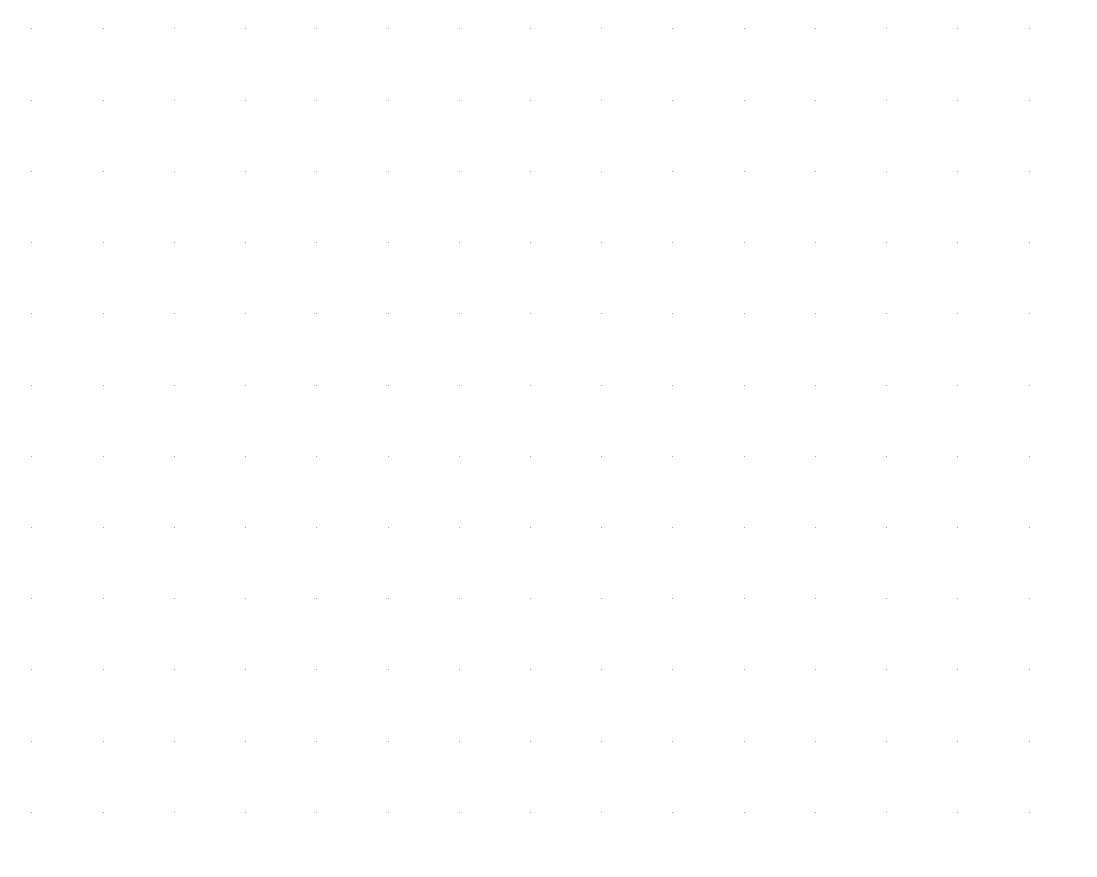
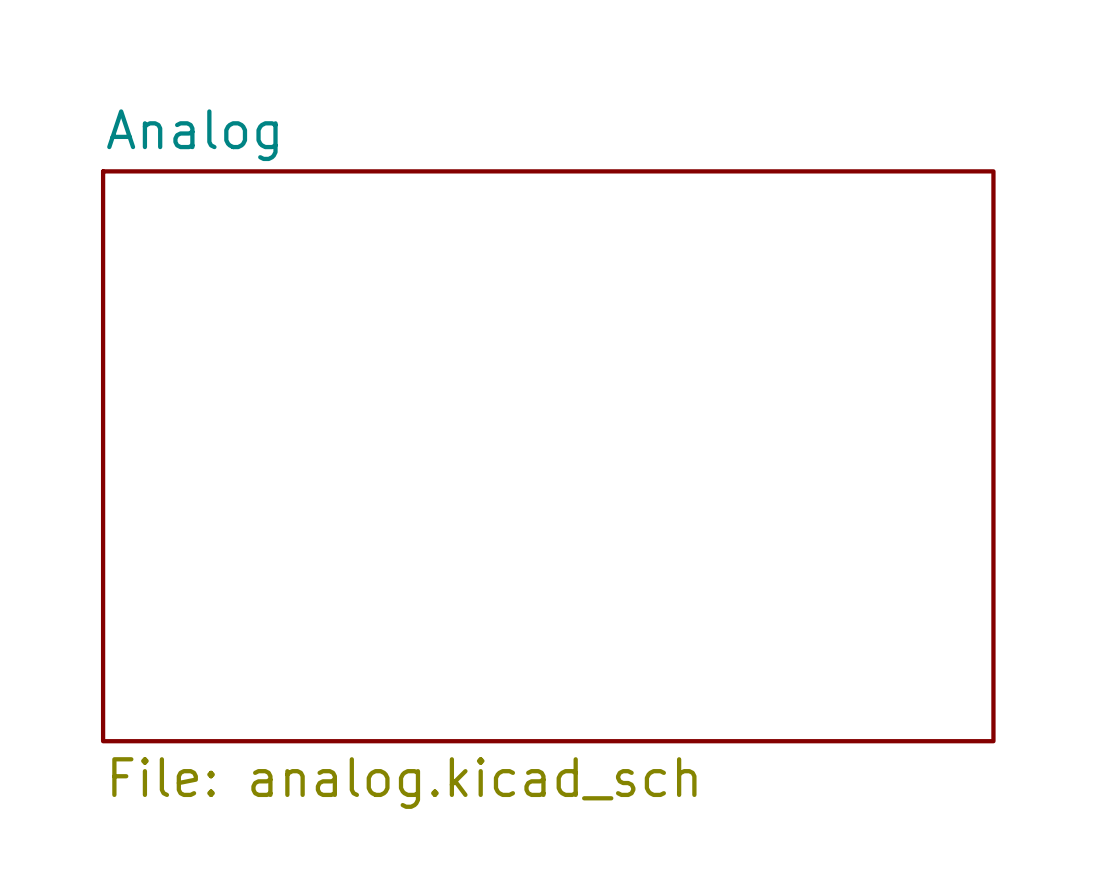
sheet Analog: none -> File: analog.kicad_sch (548, 456)

